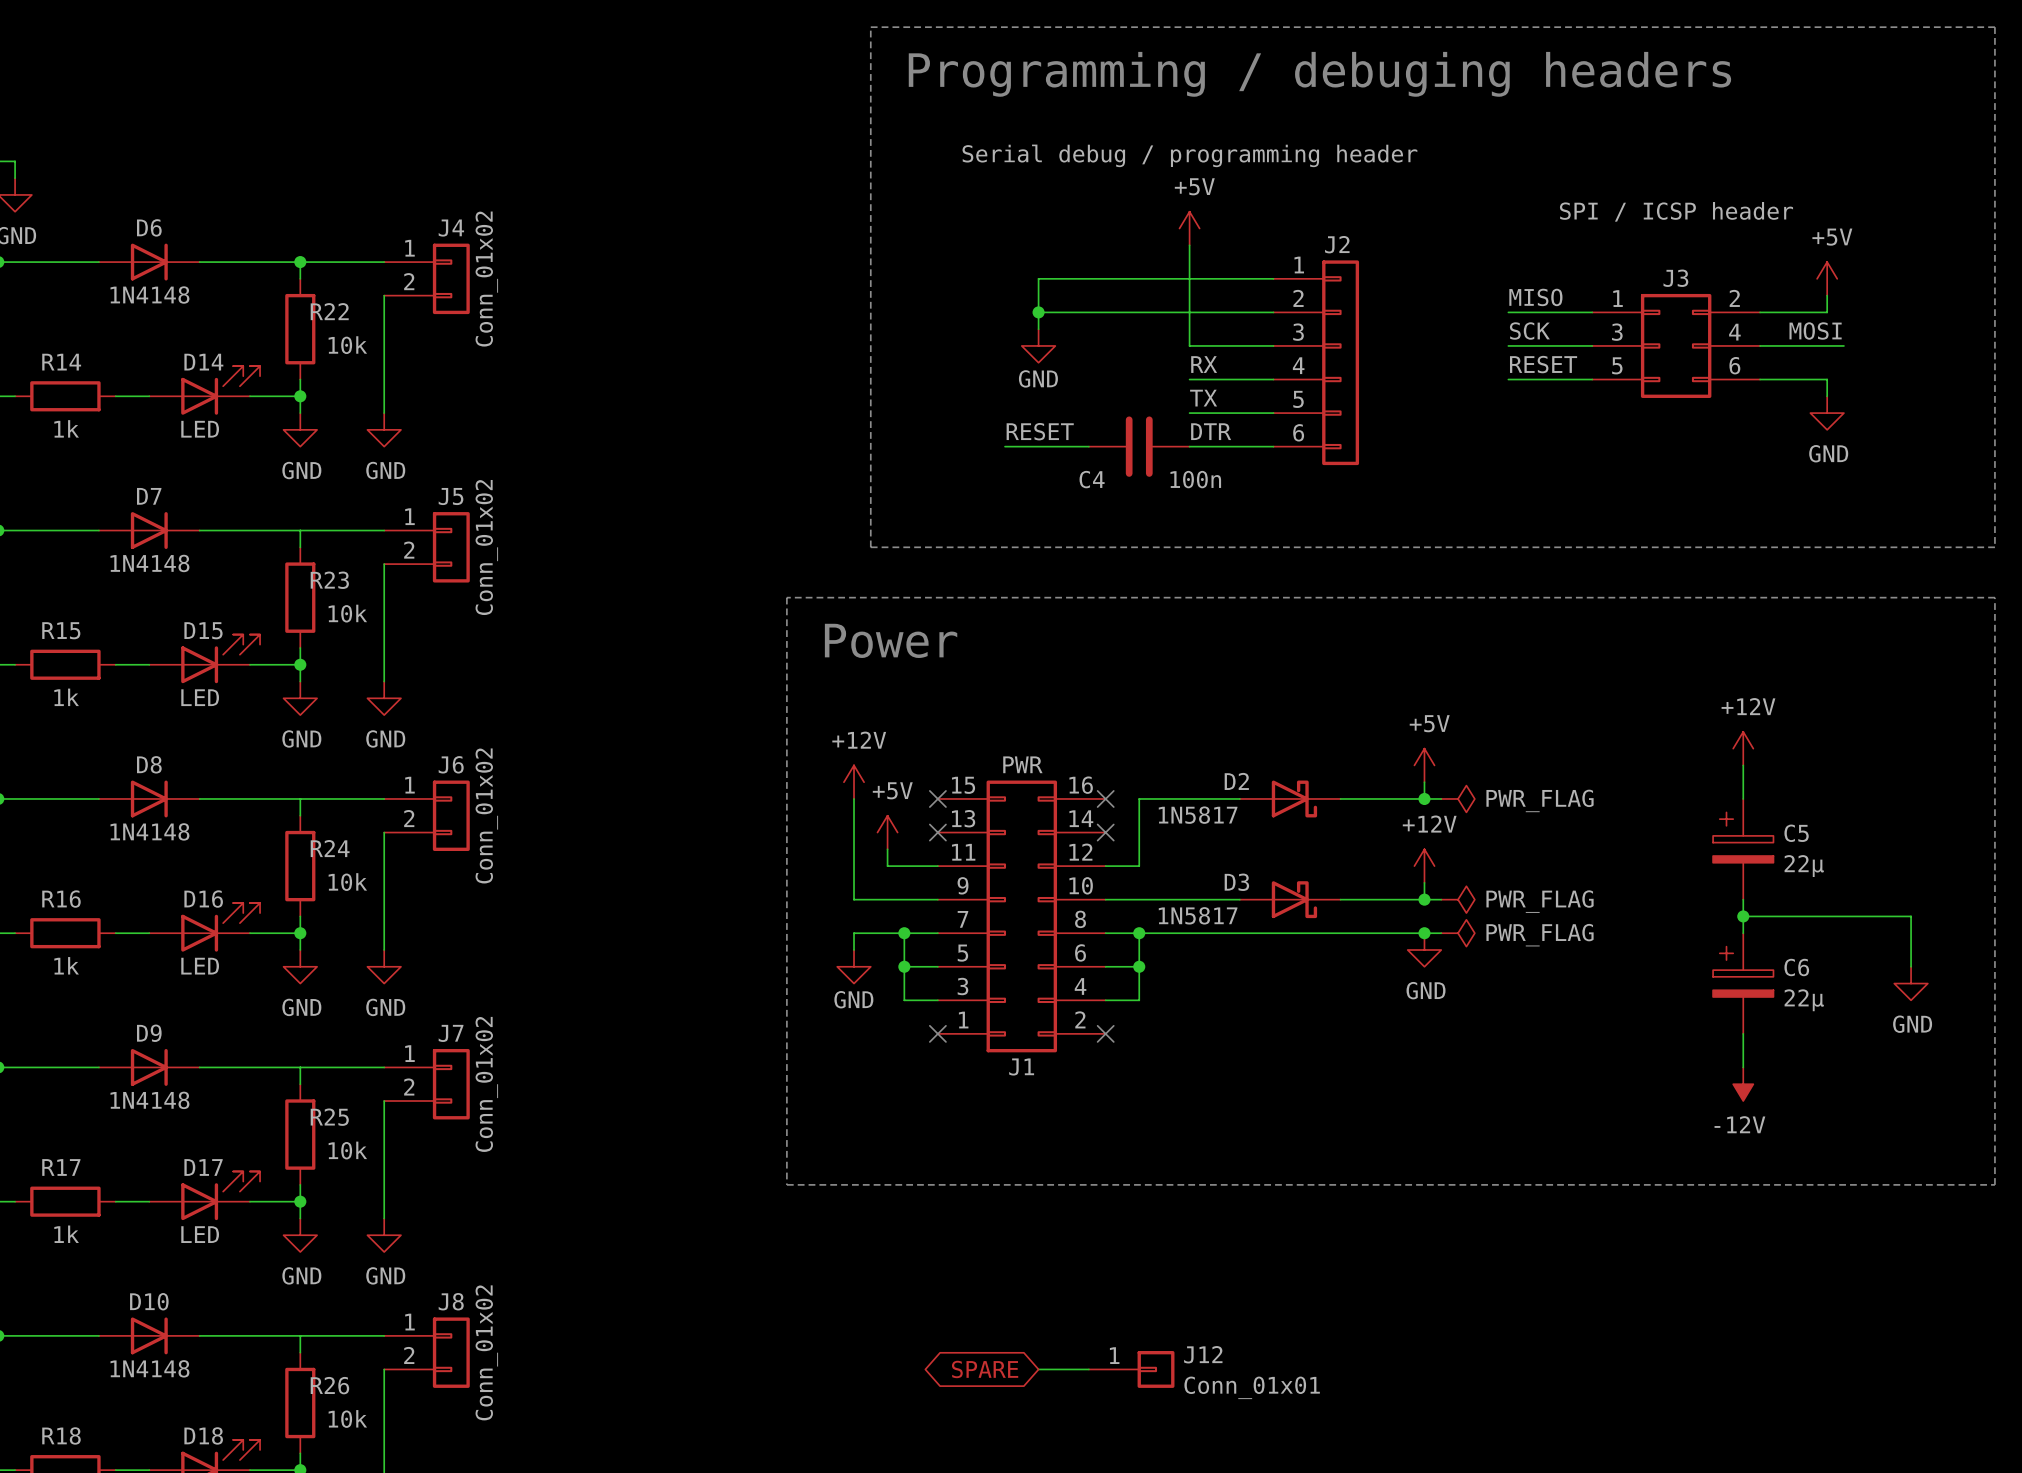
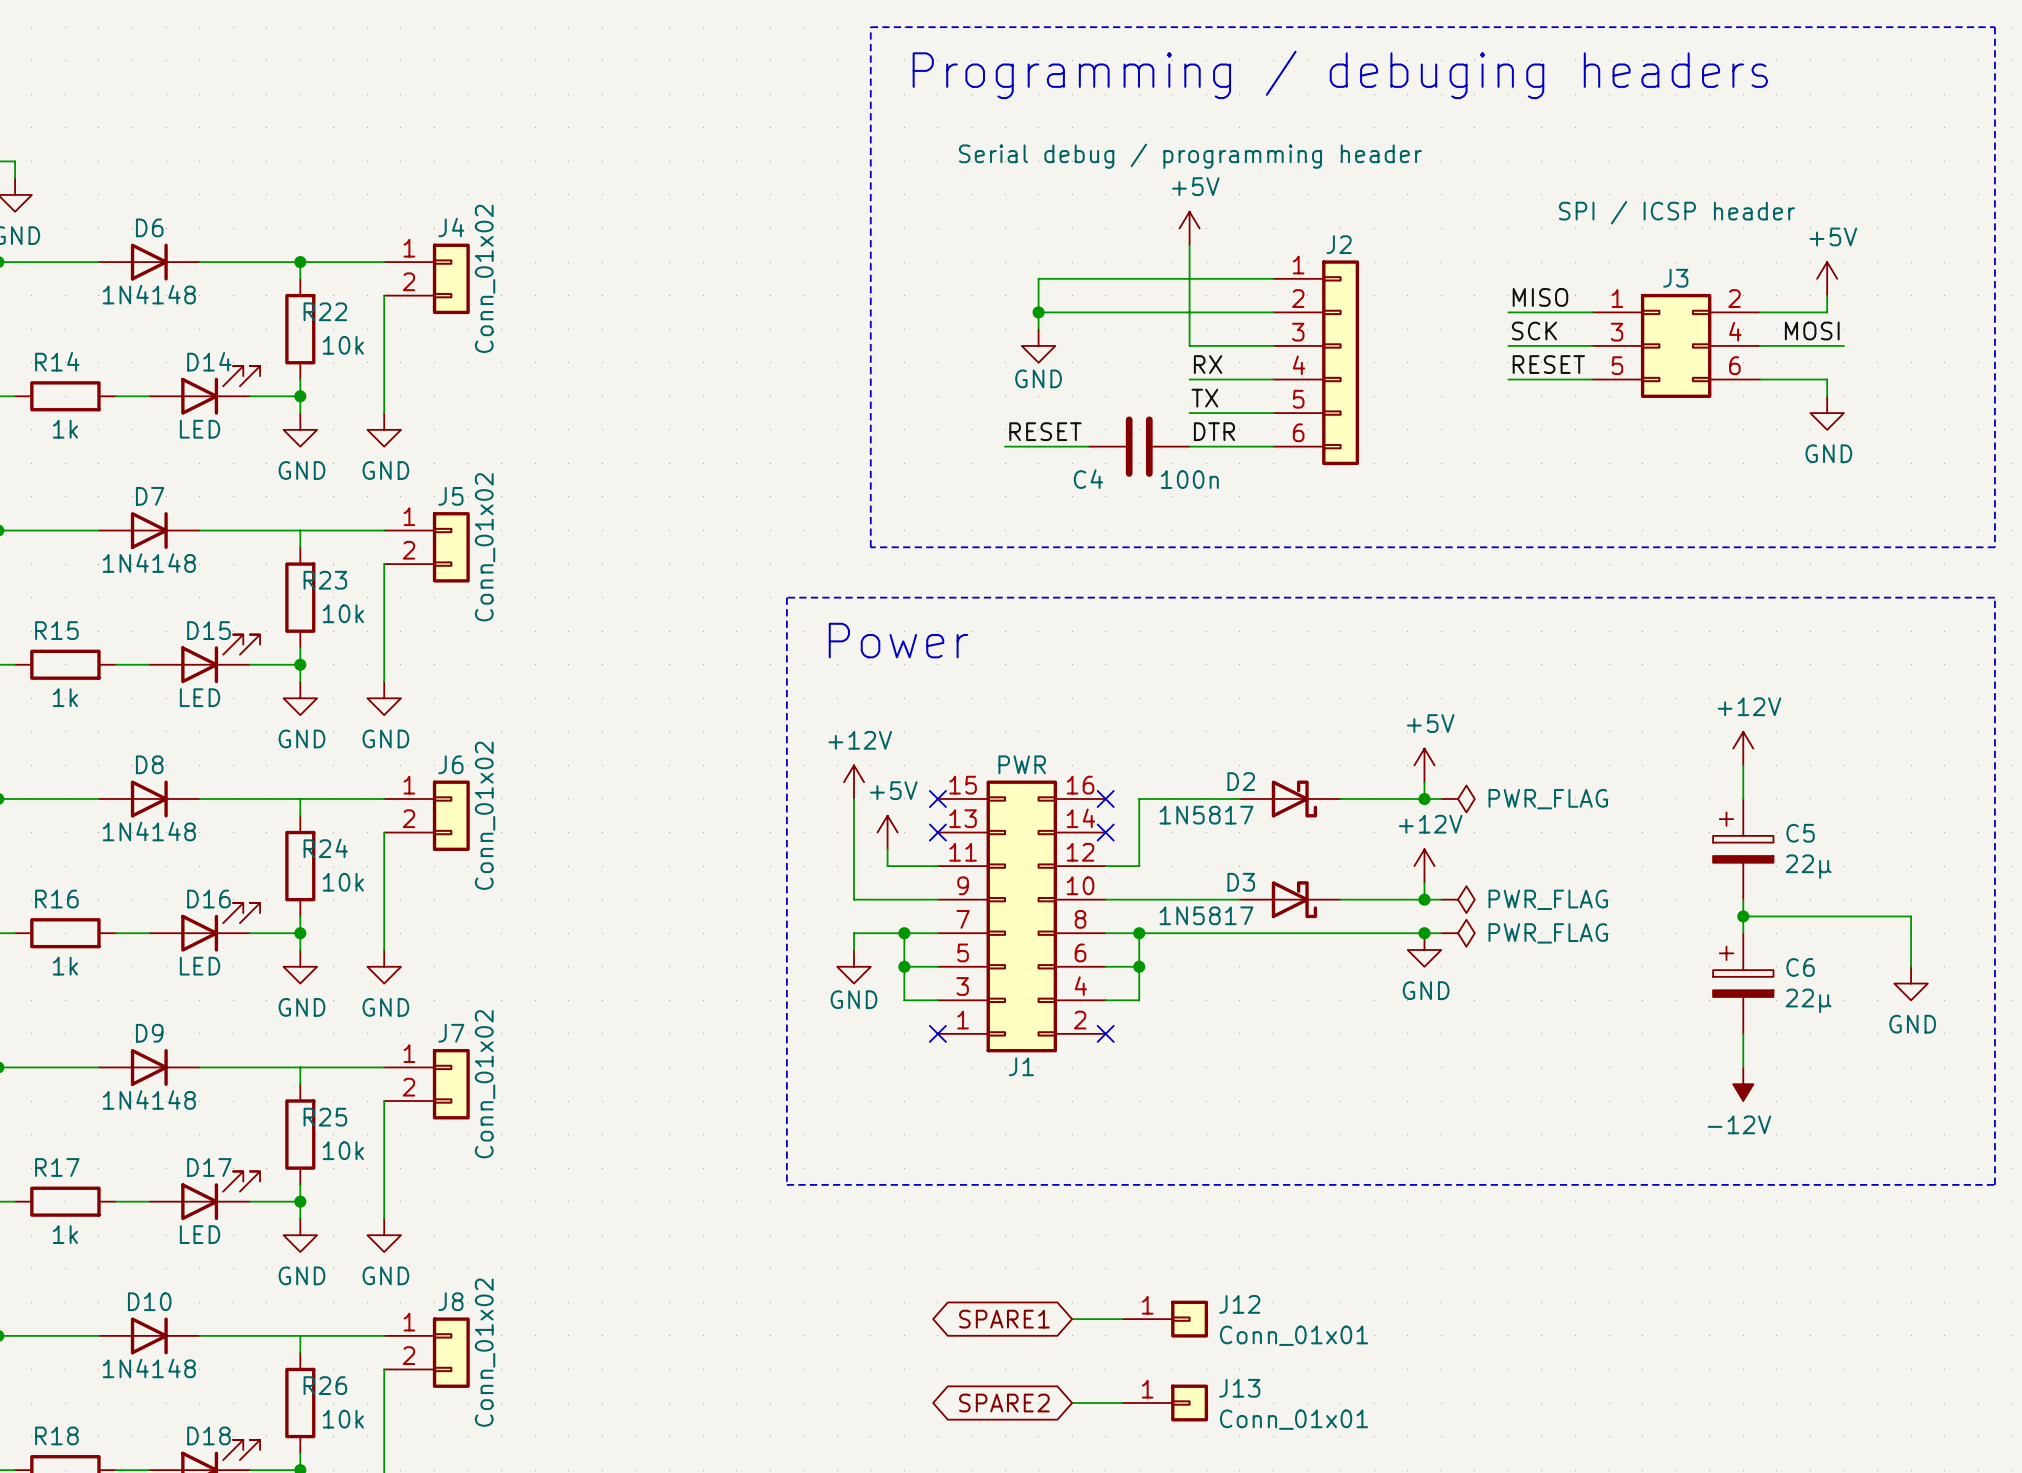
global label: none -> SPARE1 (1004, 1319)
wire: none -> (1072, 1319) (1122, 1319)
global label: SPARE (985, 1369) -> SPARE2 (1004, 1403)
wire: (1038, 1369) (1088, 1369) -> (1072, 1403) (1122, 1403)
J12 position: (1131, 1369) -> (1165, 1319)
J13: none -> Conn_01x01 (1165, 1403)

